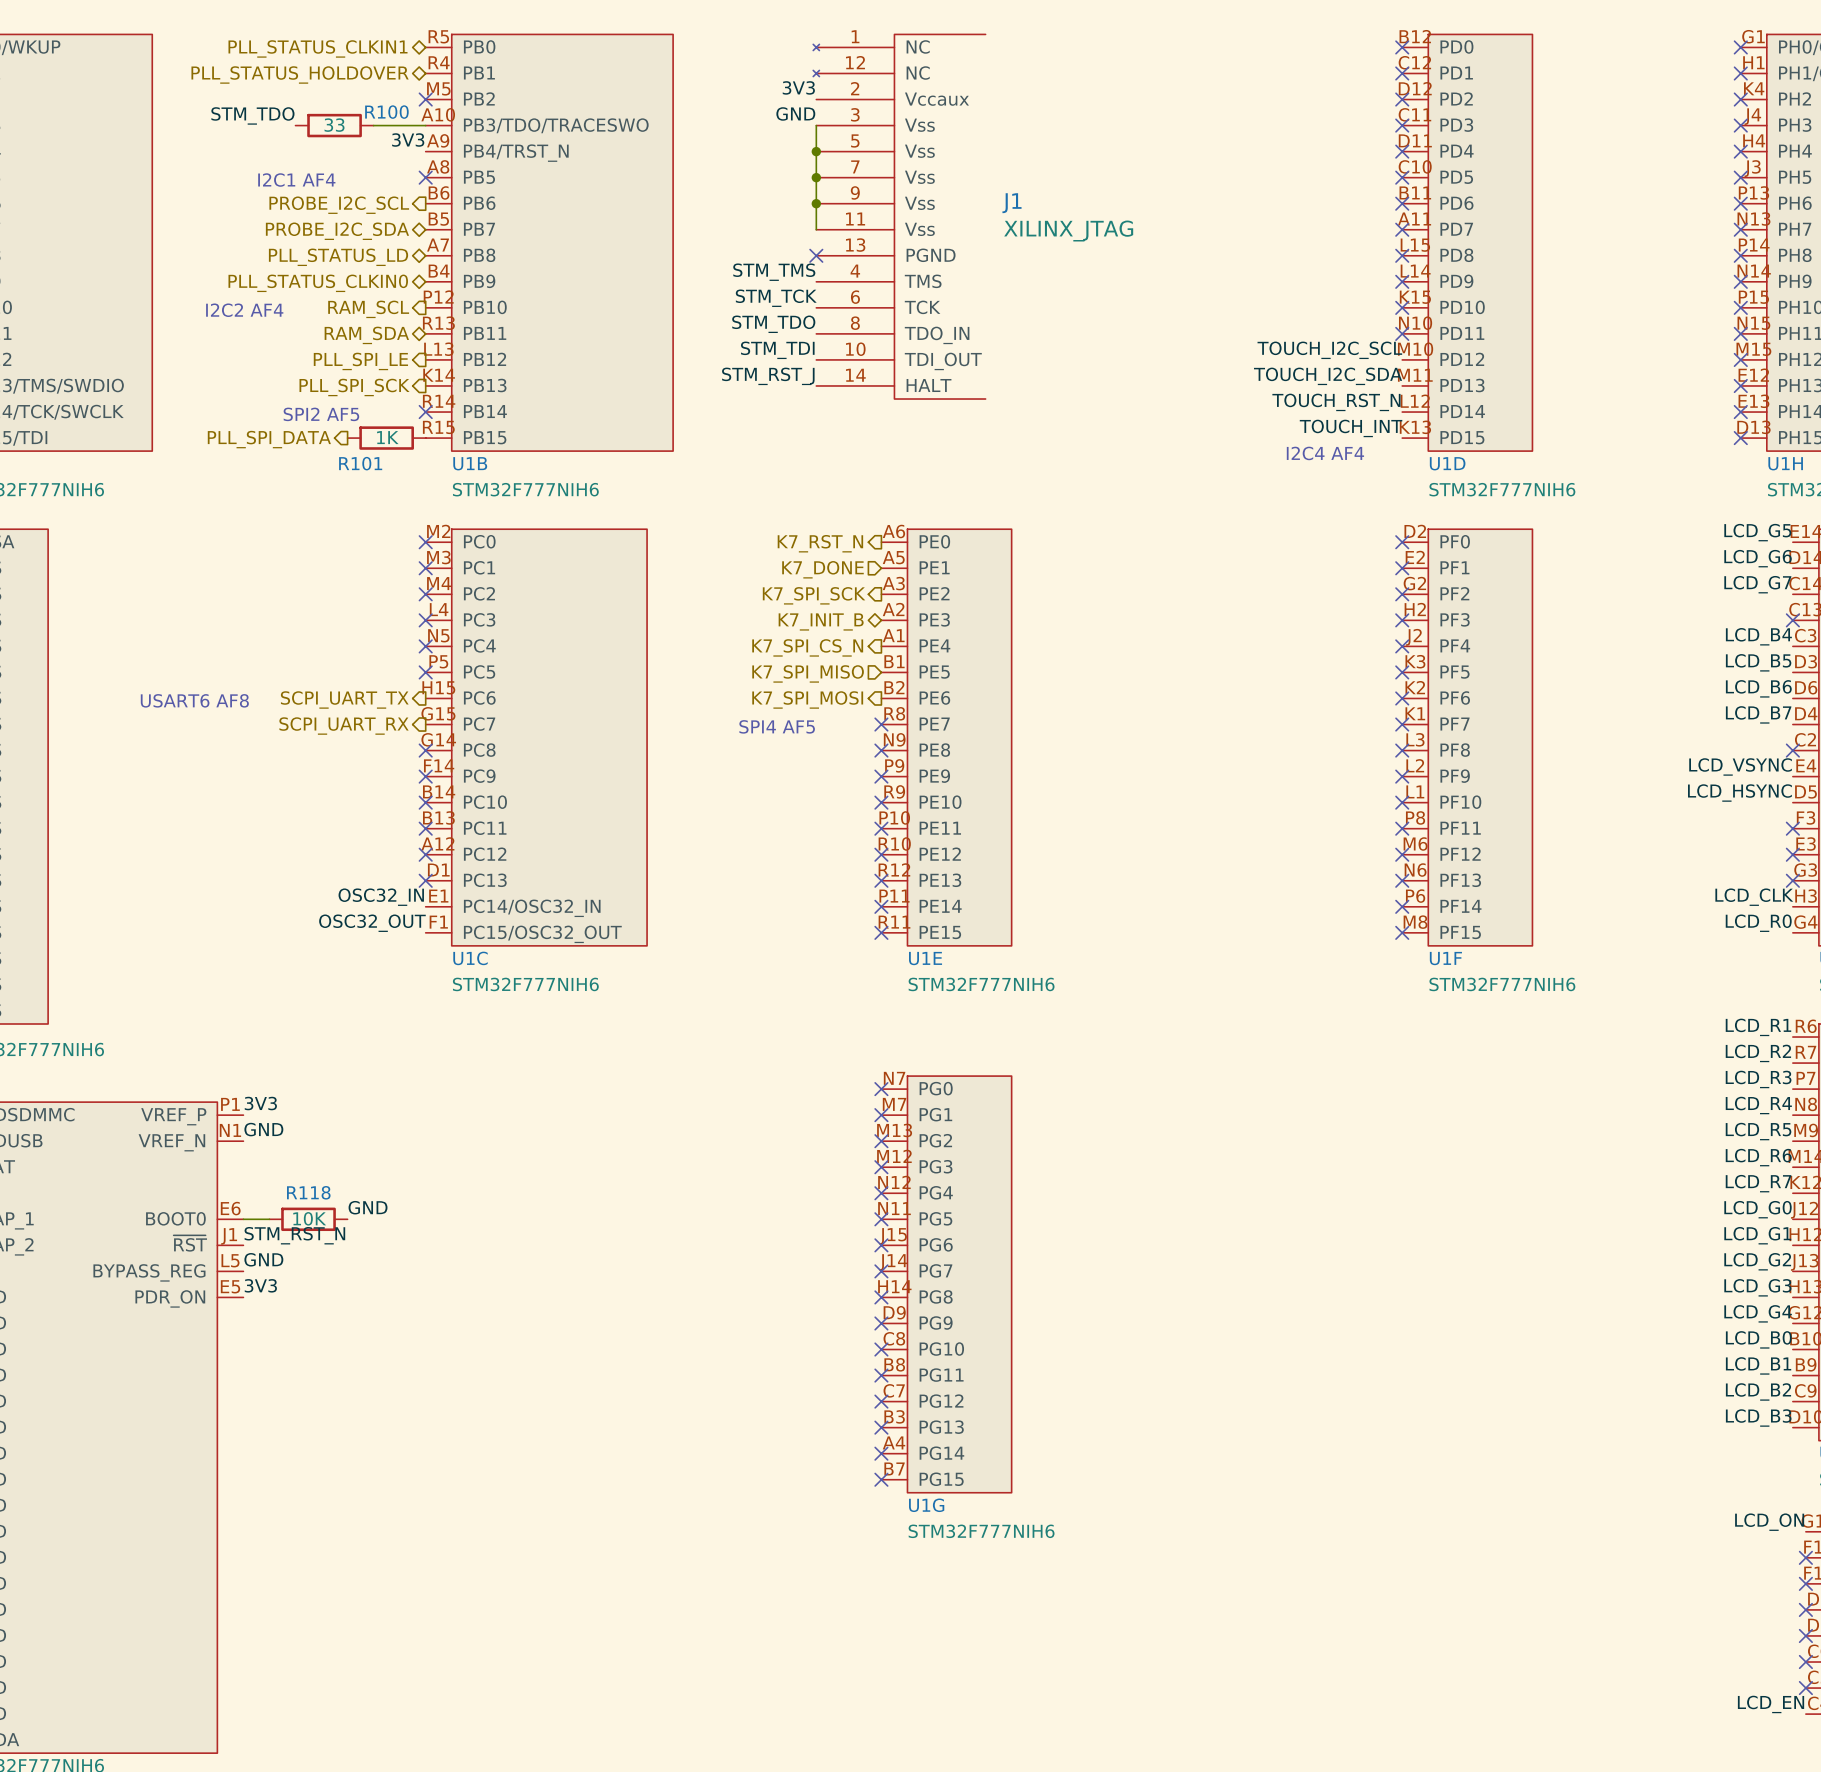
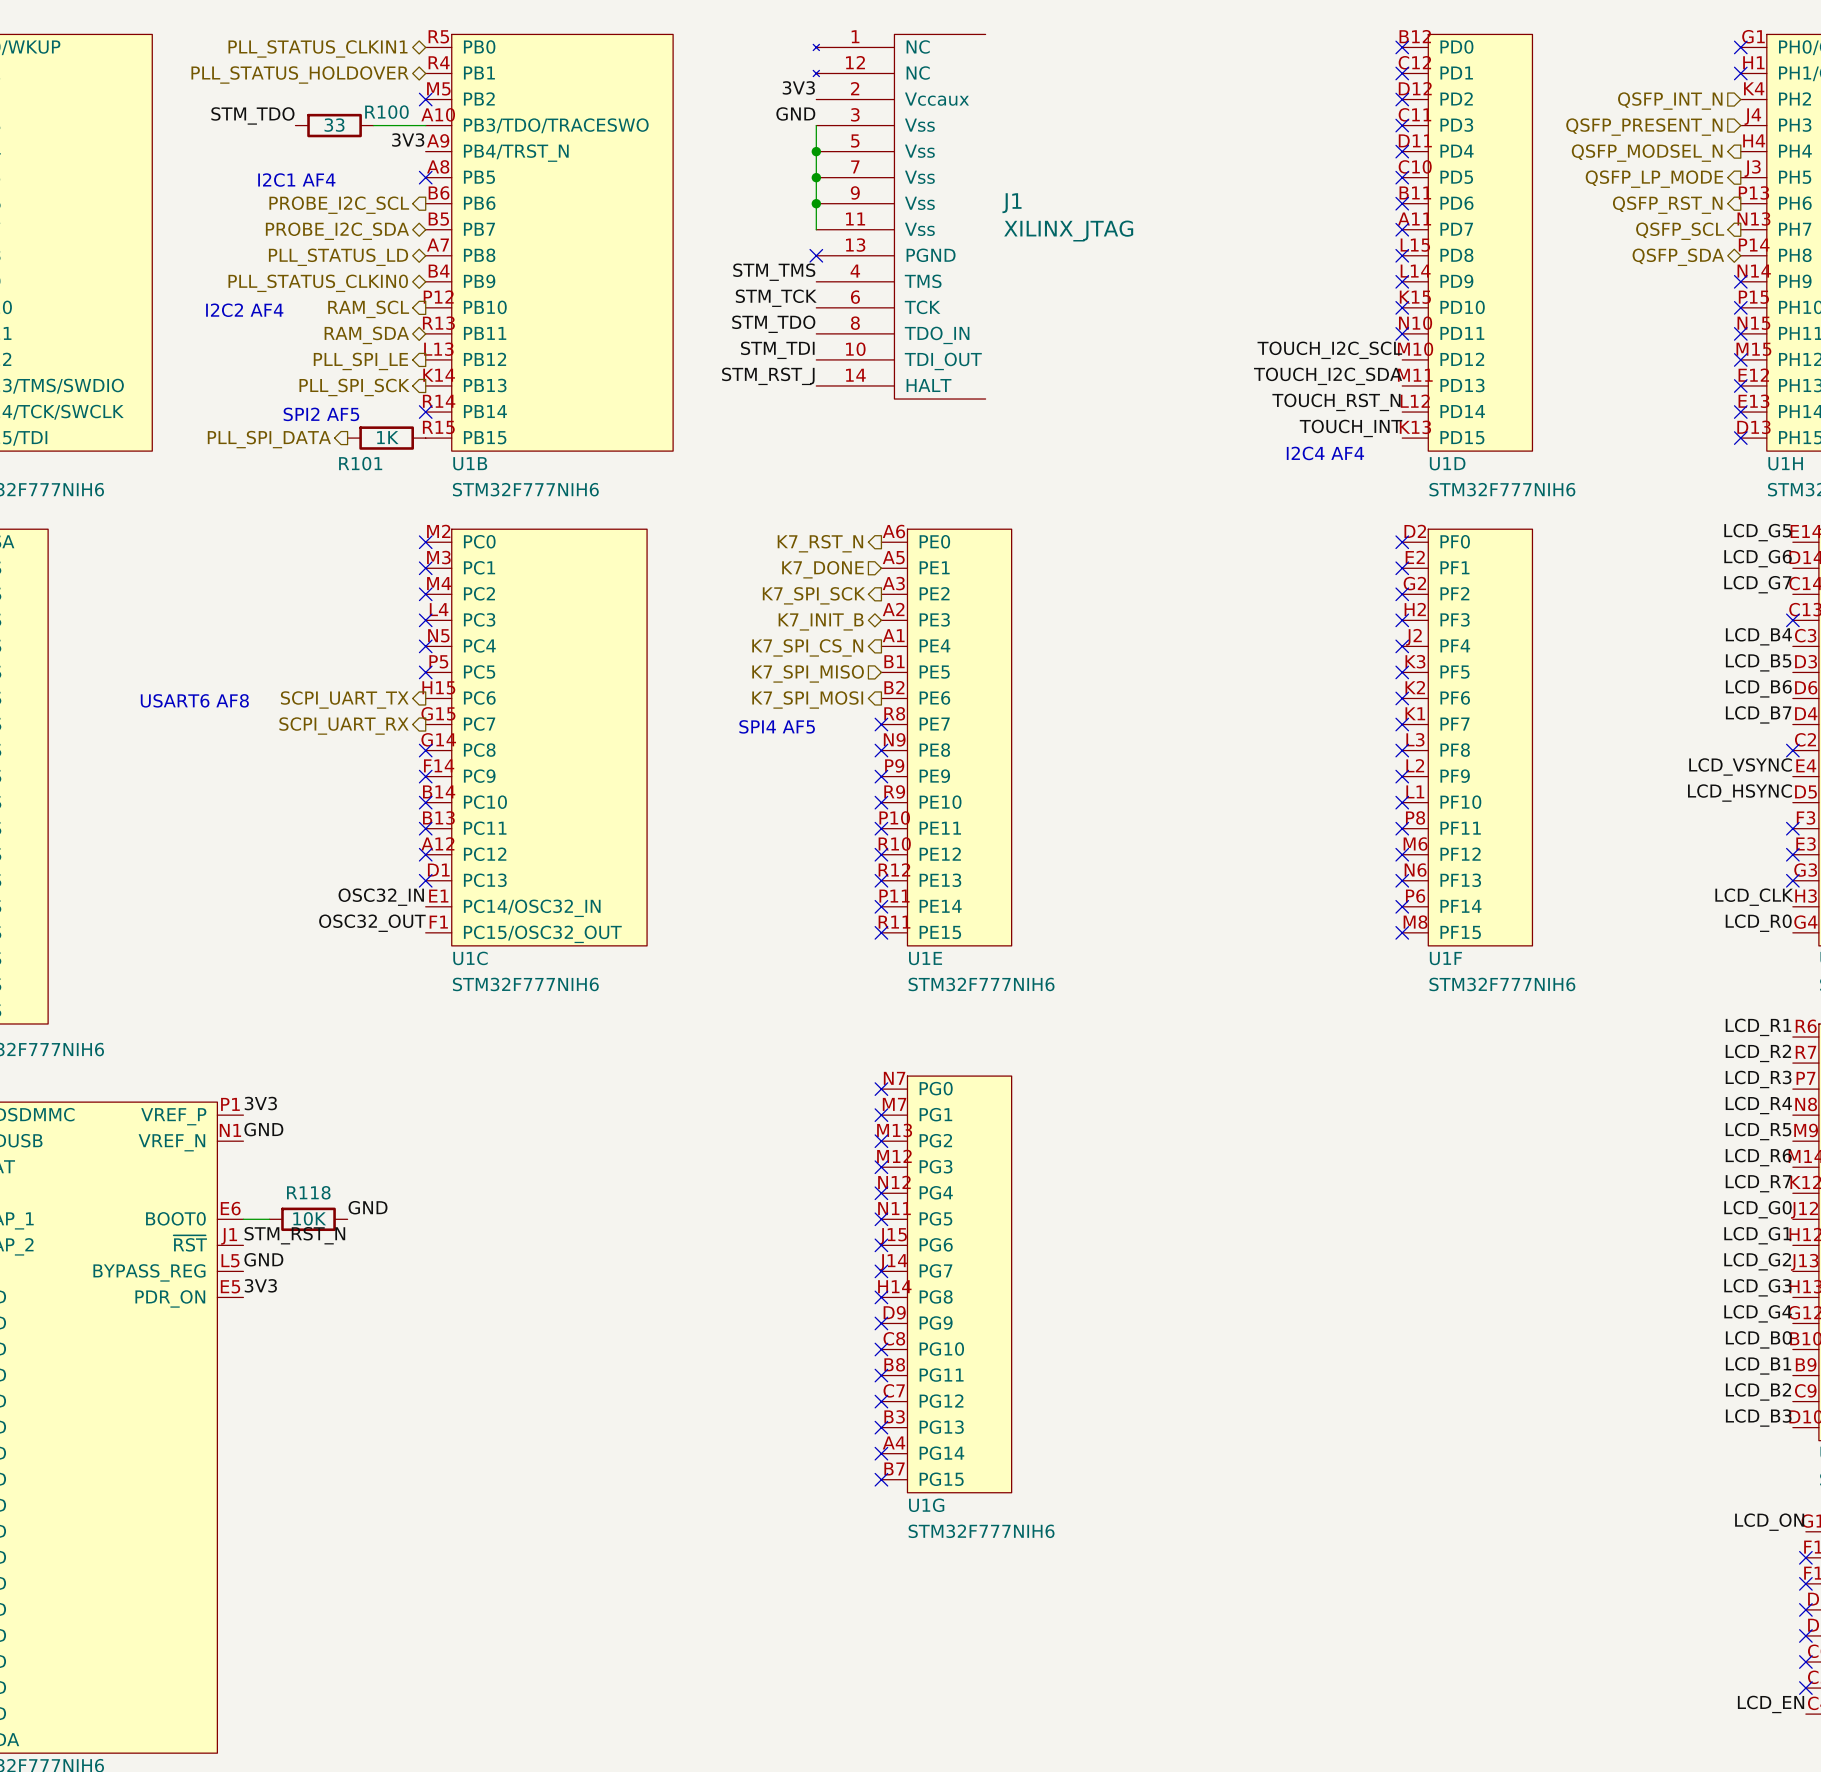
no-connect mark: (1740, 99) -> none
hierarchical label: none -> QSFP_INT_N (1670, 101)
no-connect mark: (1740, 125) -> none
hierarchical label: none -> QSFP_PRESENT_N (1644, 127)
no-connect mark: (1740, 151) -> none
hierarchical label: none -> QSFP_MODSEL_N (1647, 153)
no-connect mark: (1740, 177) -> none
hierarchical label: none -> QSFP_LP_MODE (1654, 179)
no-connect mark: (1740, 203) -> none
hierarchical label: none -> QSFP_RST_N (1667, 205)
no-connect mark: (1740, 229) -> none
hierarchical label: none -> QSFP_SCL (1680, 231)
no-connect mark: (1740, 255) -> none
hierarchical label: none -> QSFP_SDA (1678, 257)

